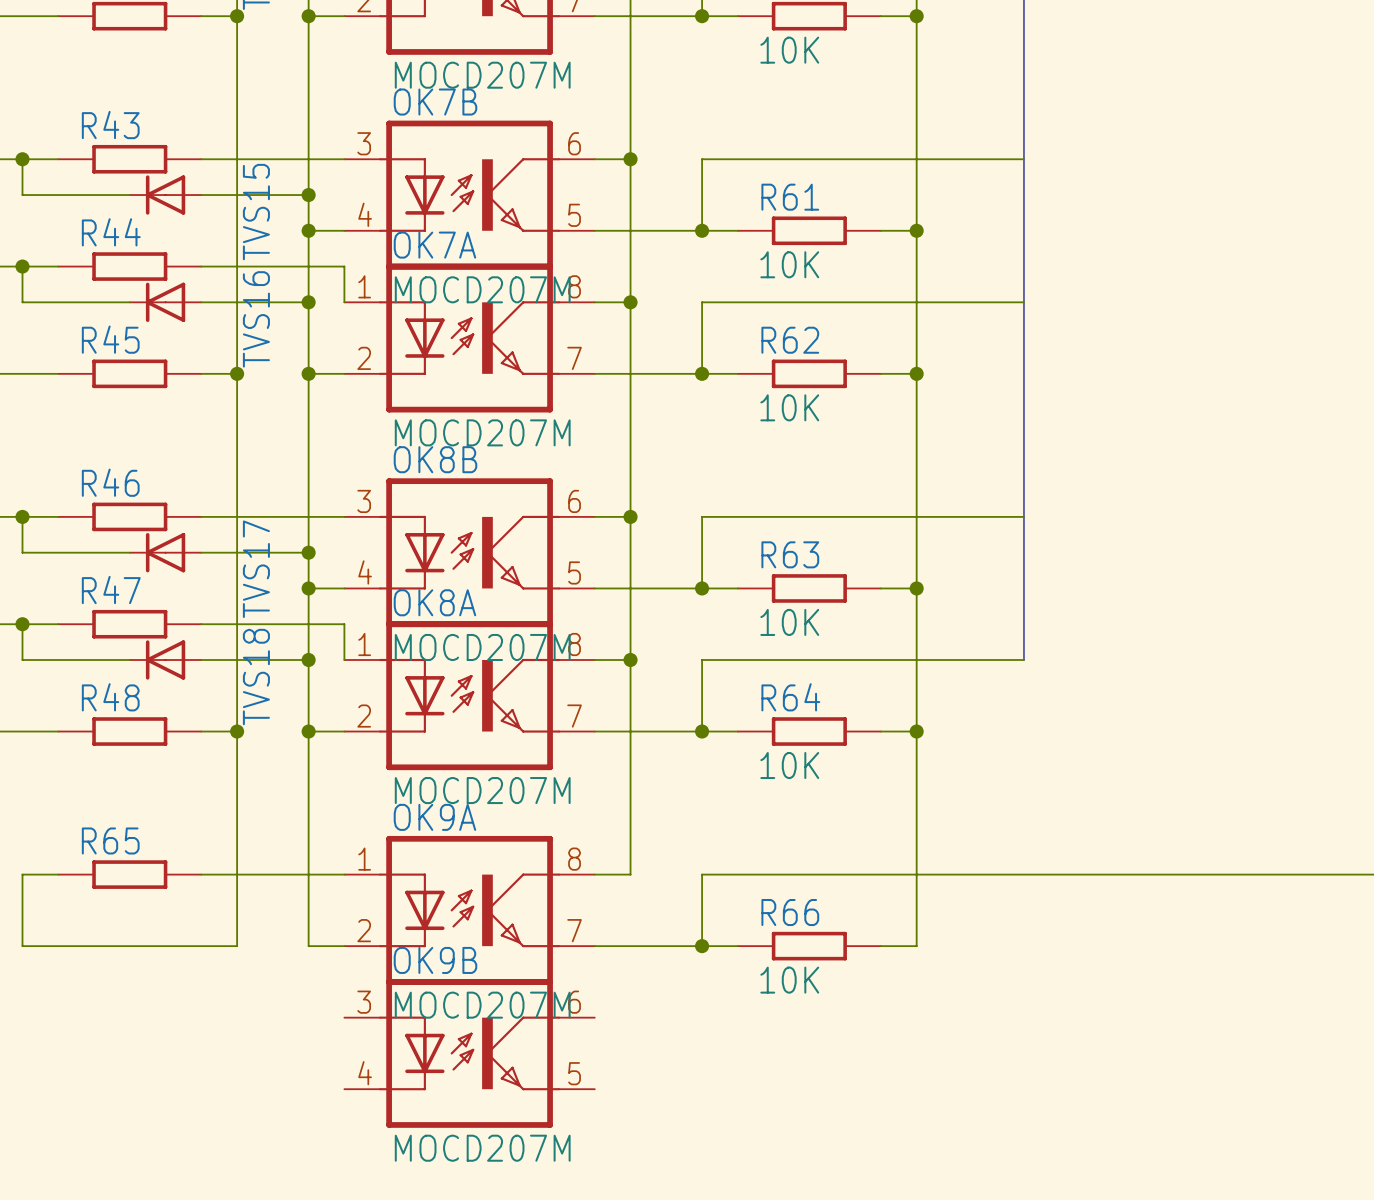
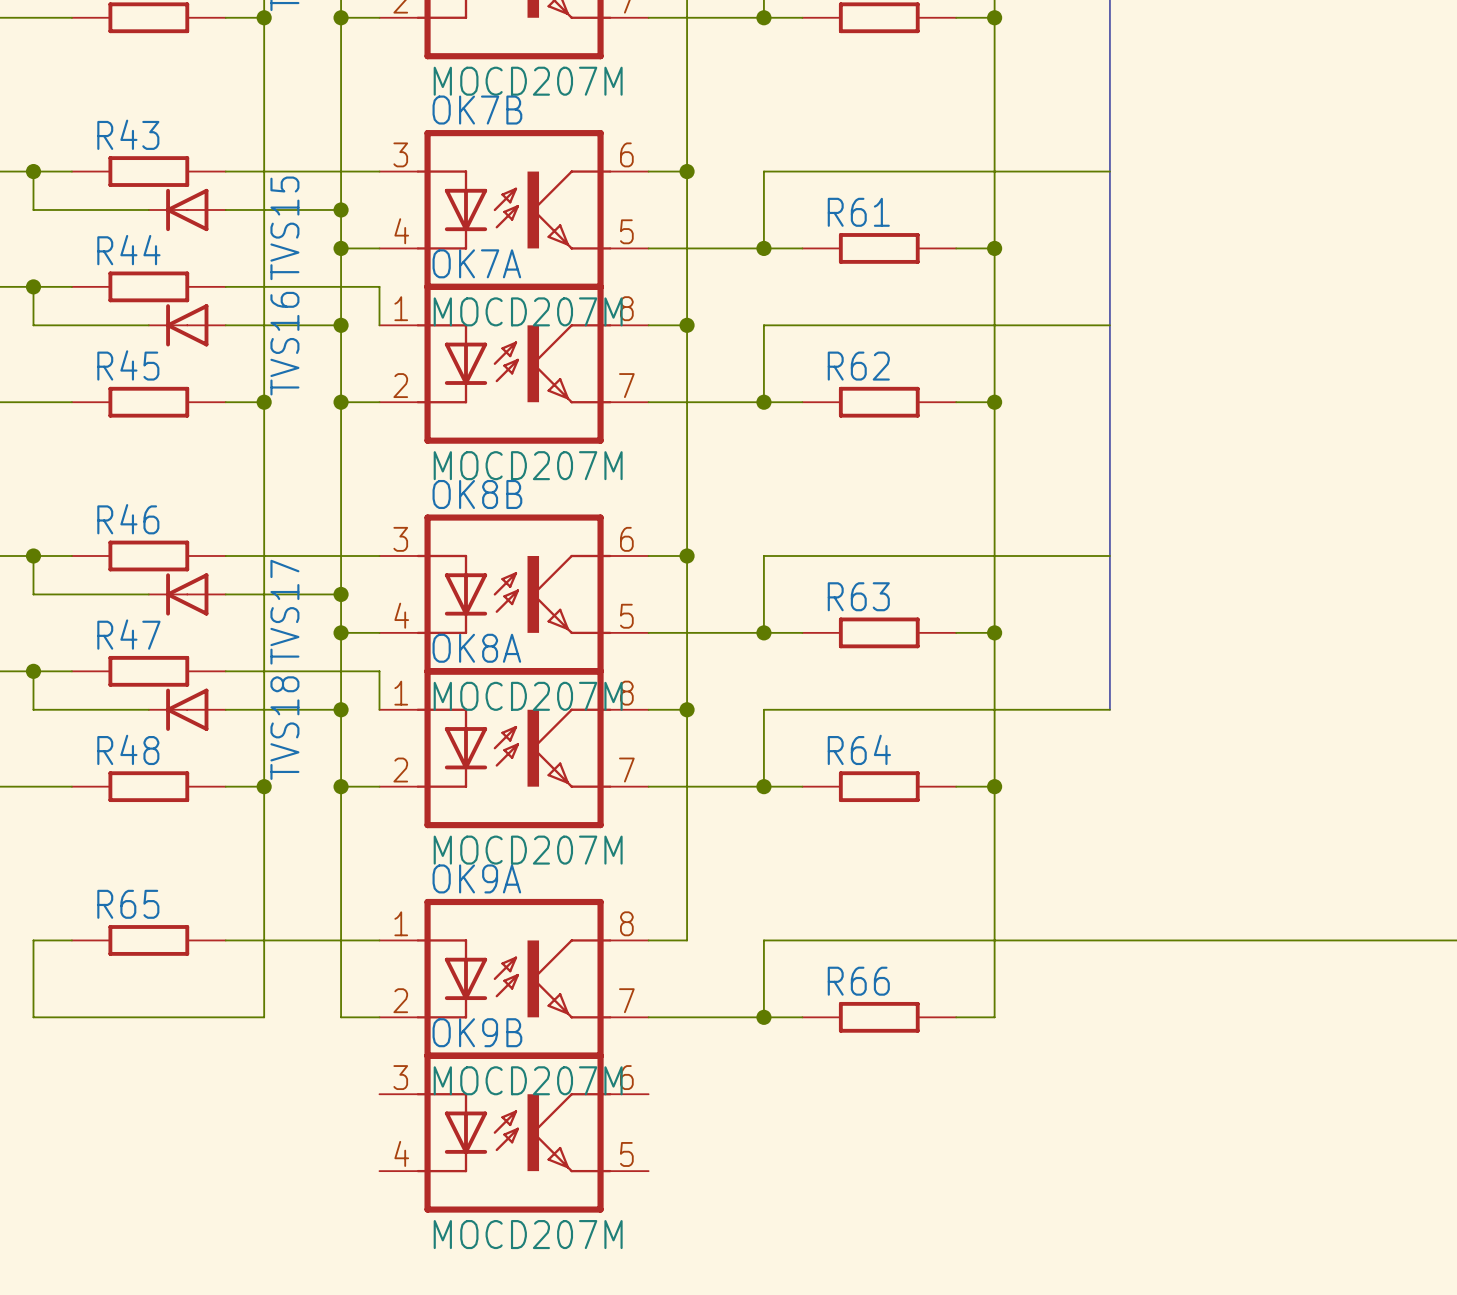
part value: 10K (789, 50) -> none
R61 value: 10K (789, 264) -> none
R62 value: 10K (789, 407) -> none
R63 value: 10K (789, 622) -> none
R64 value: 10K (789, 765) -> none
R66 value: 10K (789, 980) -> none

